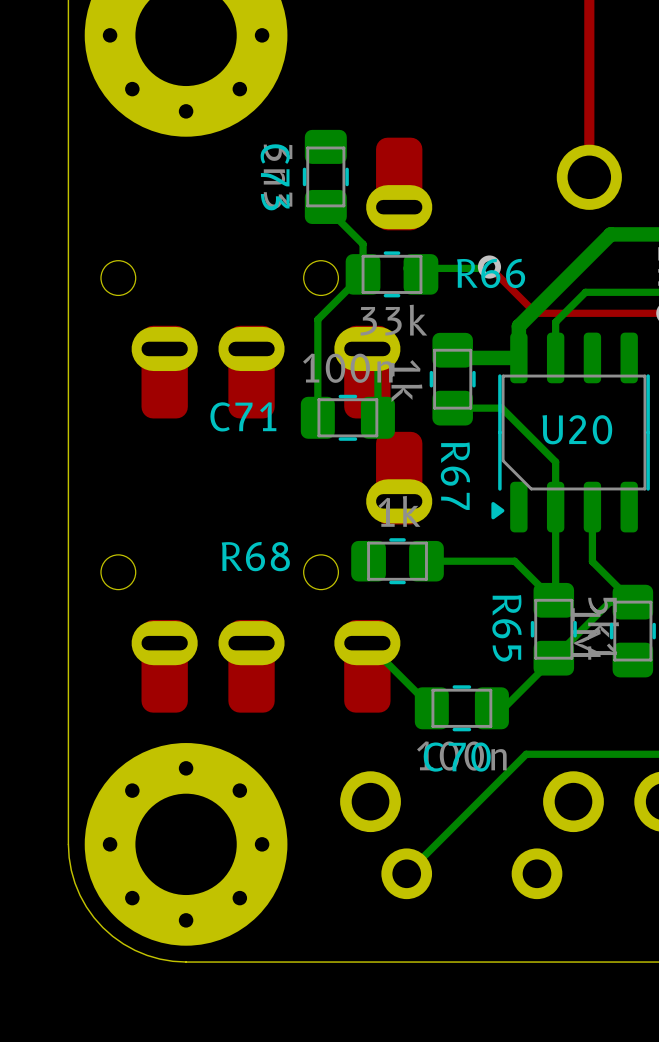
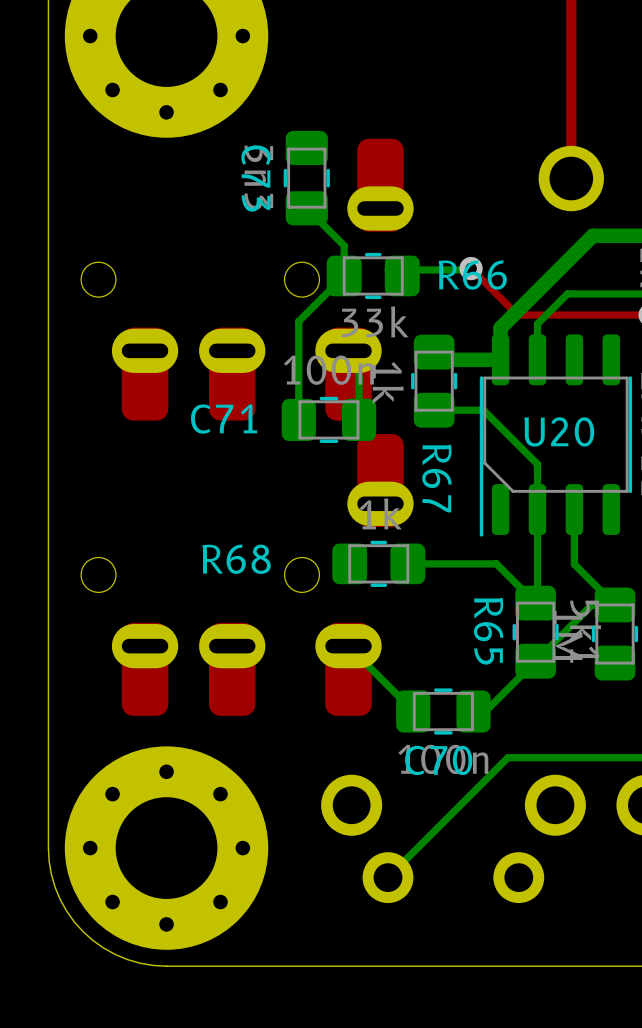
U20 footprint: [491, 332, 650, 533] -> [479, 334, 633, 537]

